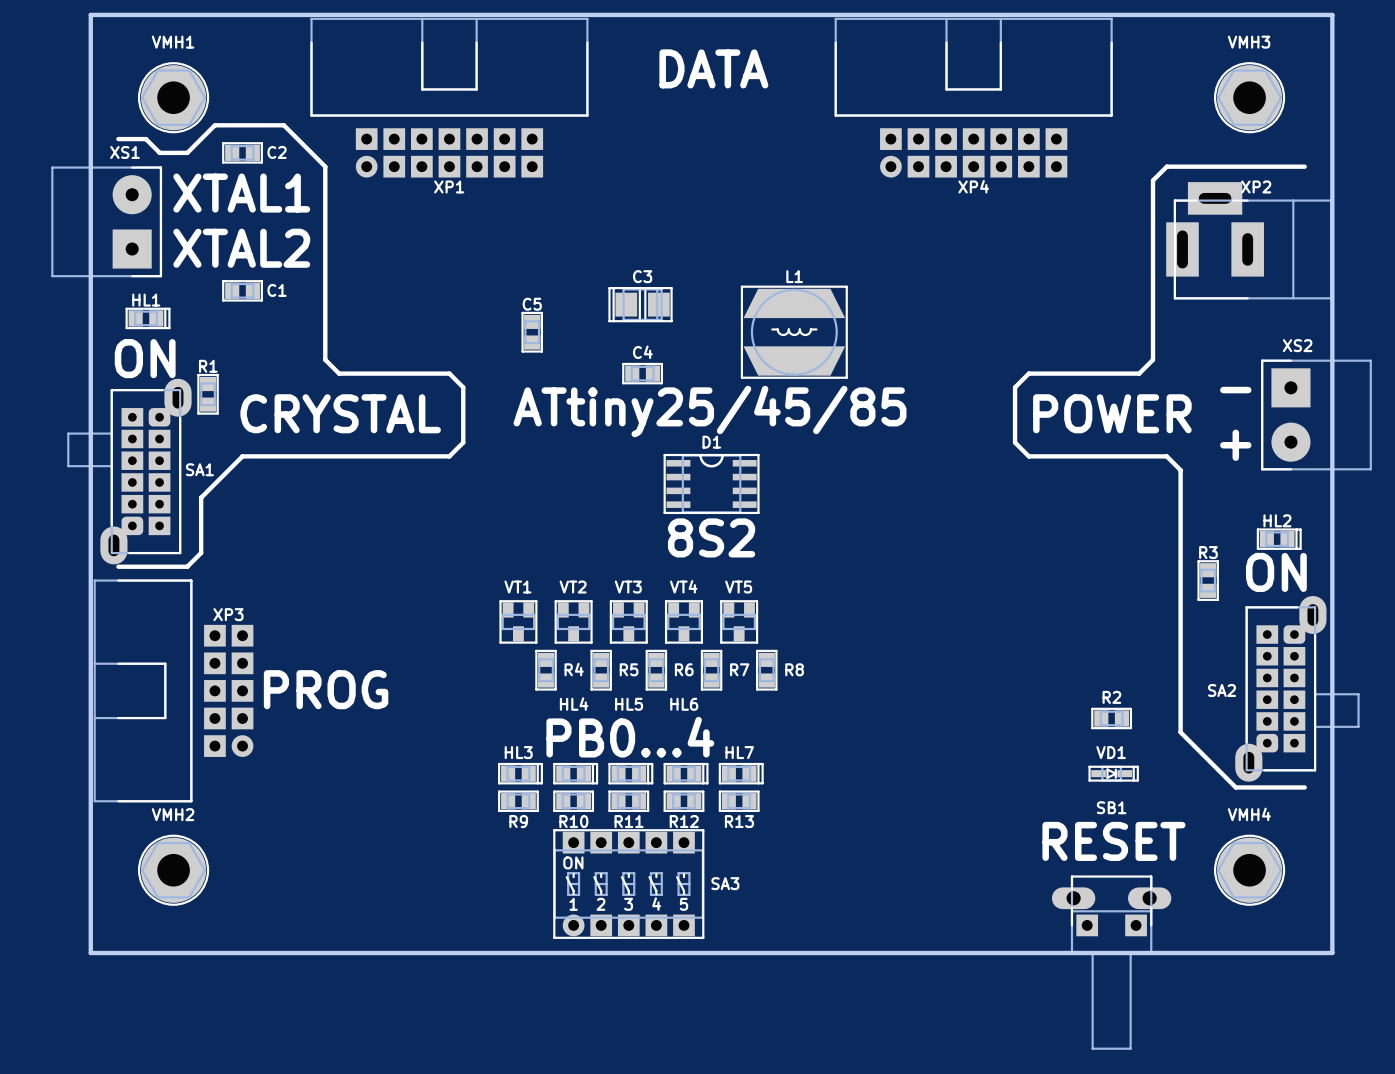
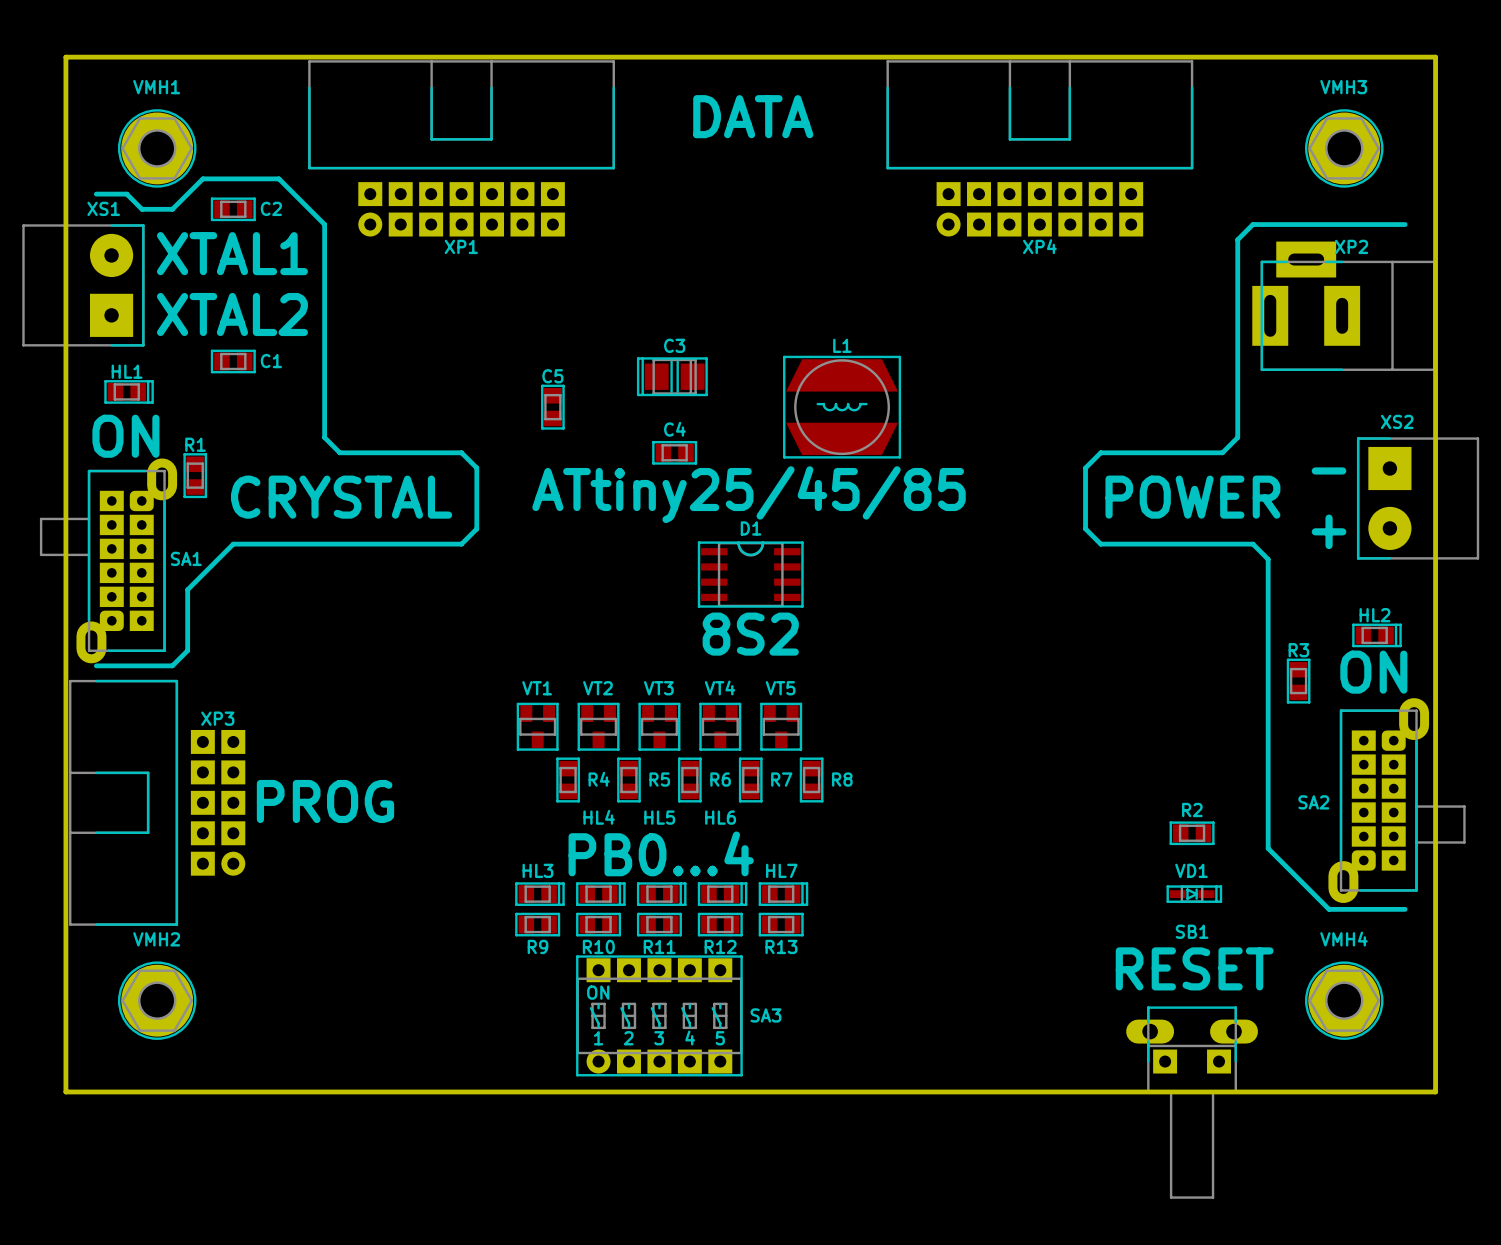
VMH1 footprint: [137, 62, 210, 134] -> [117, 109, 197, 188]
VMH3 footprint: [1214, 62, 1286, 134] -> [1305, 109, 1384, 188]
VMH2 footprint: [137, 834, 210, 906] -> [117, 961, 197, 1040]
VMH4 footprint: [1214, 834, 1286, 906] -> [1305, 961, 1384, 1040]

